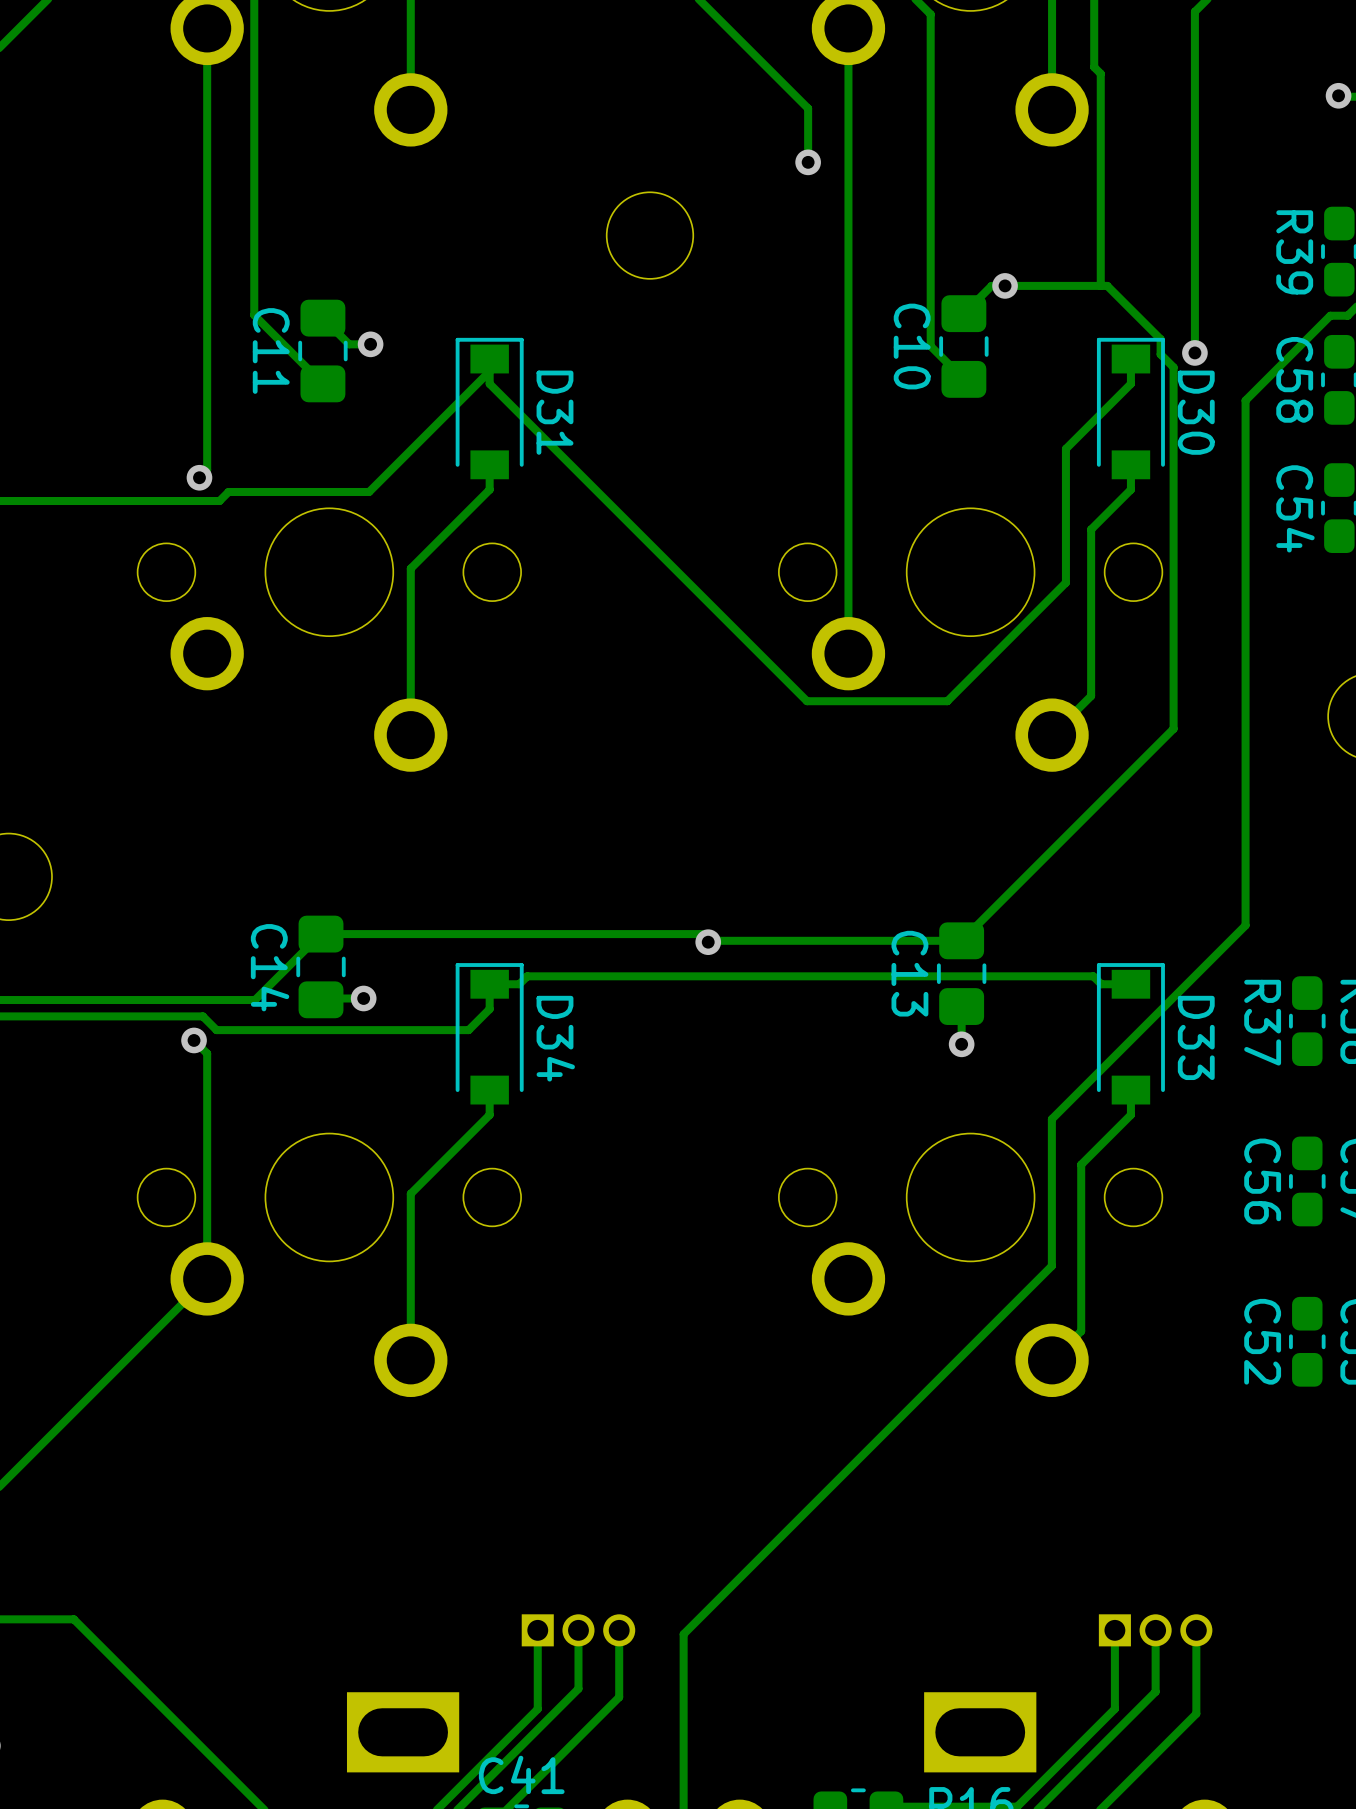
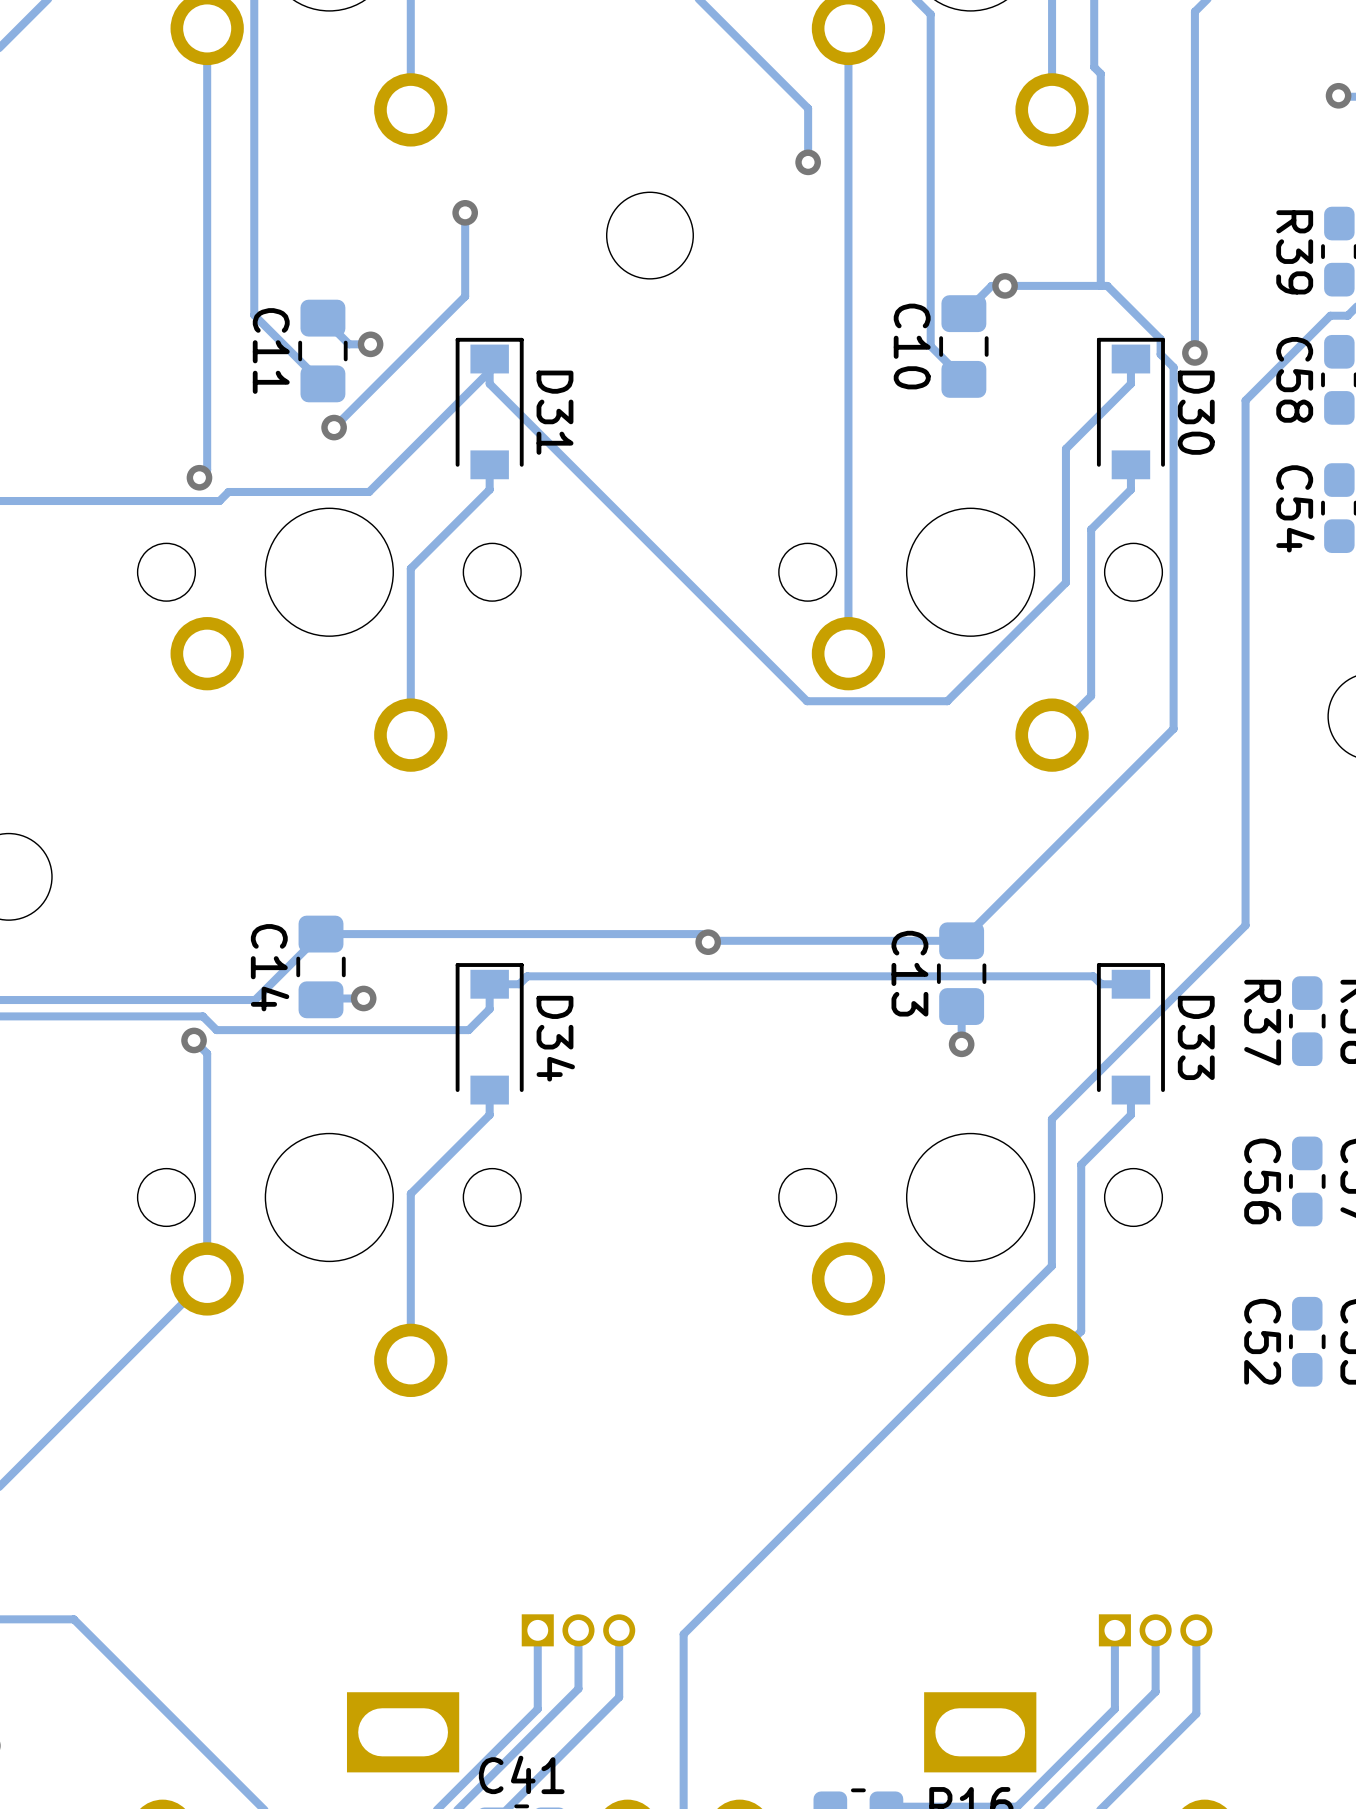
track: none -> (465, 212) (465, 296) (334, 427)
via: none -> (465, 212)
via: none -> (334, 427)

